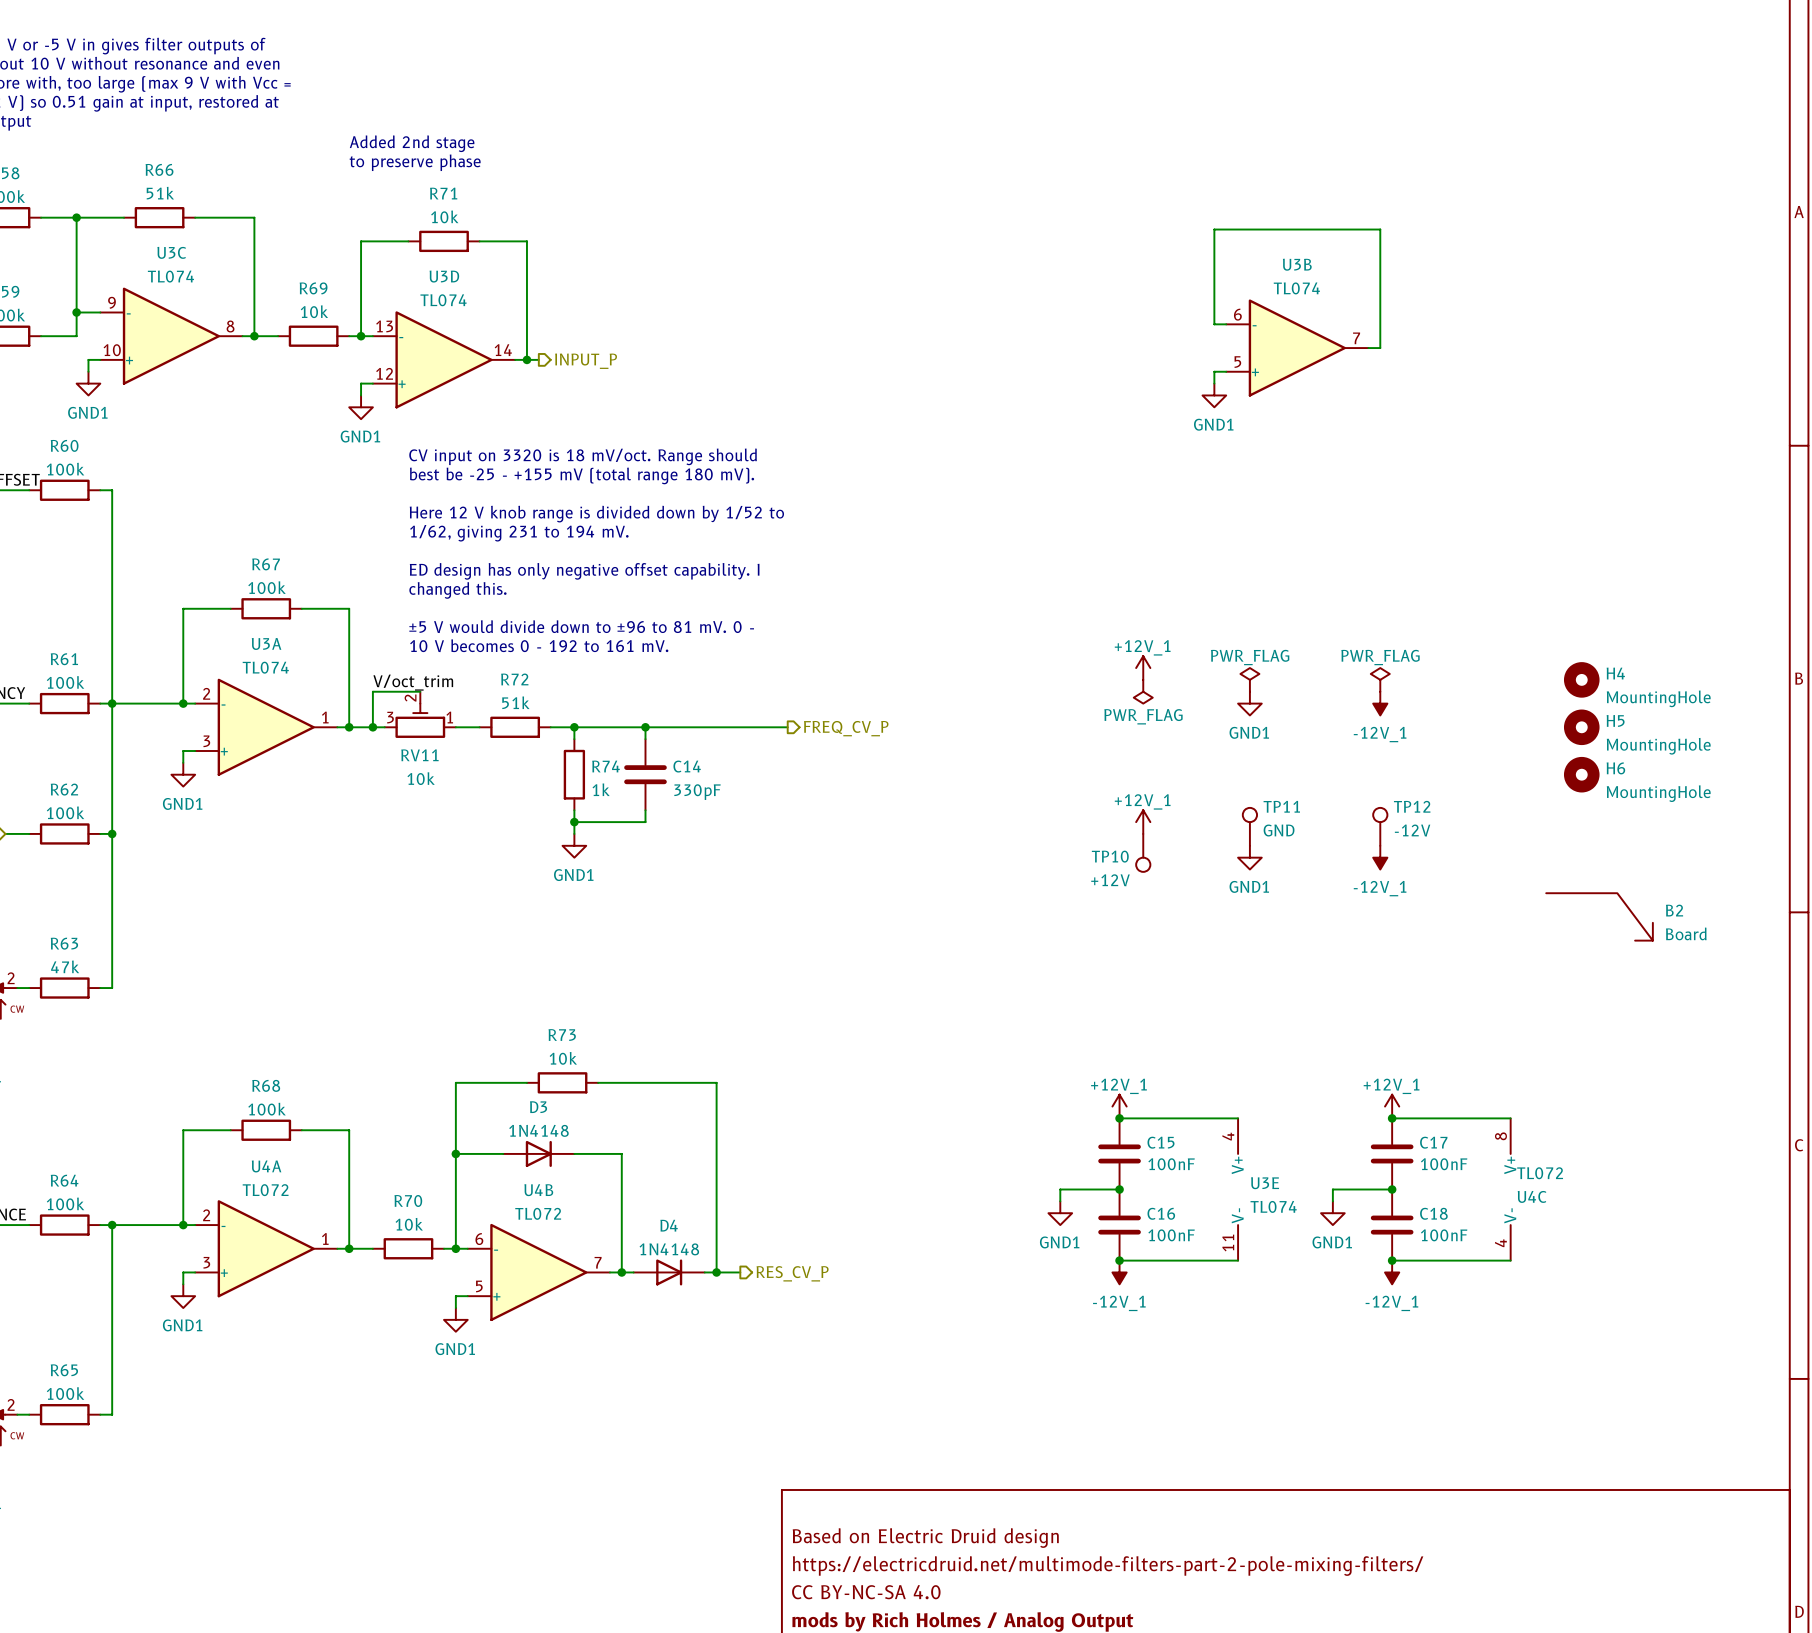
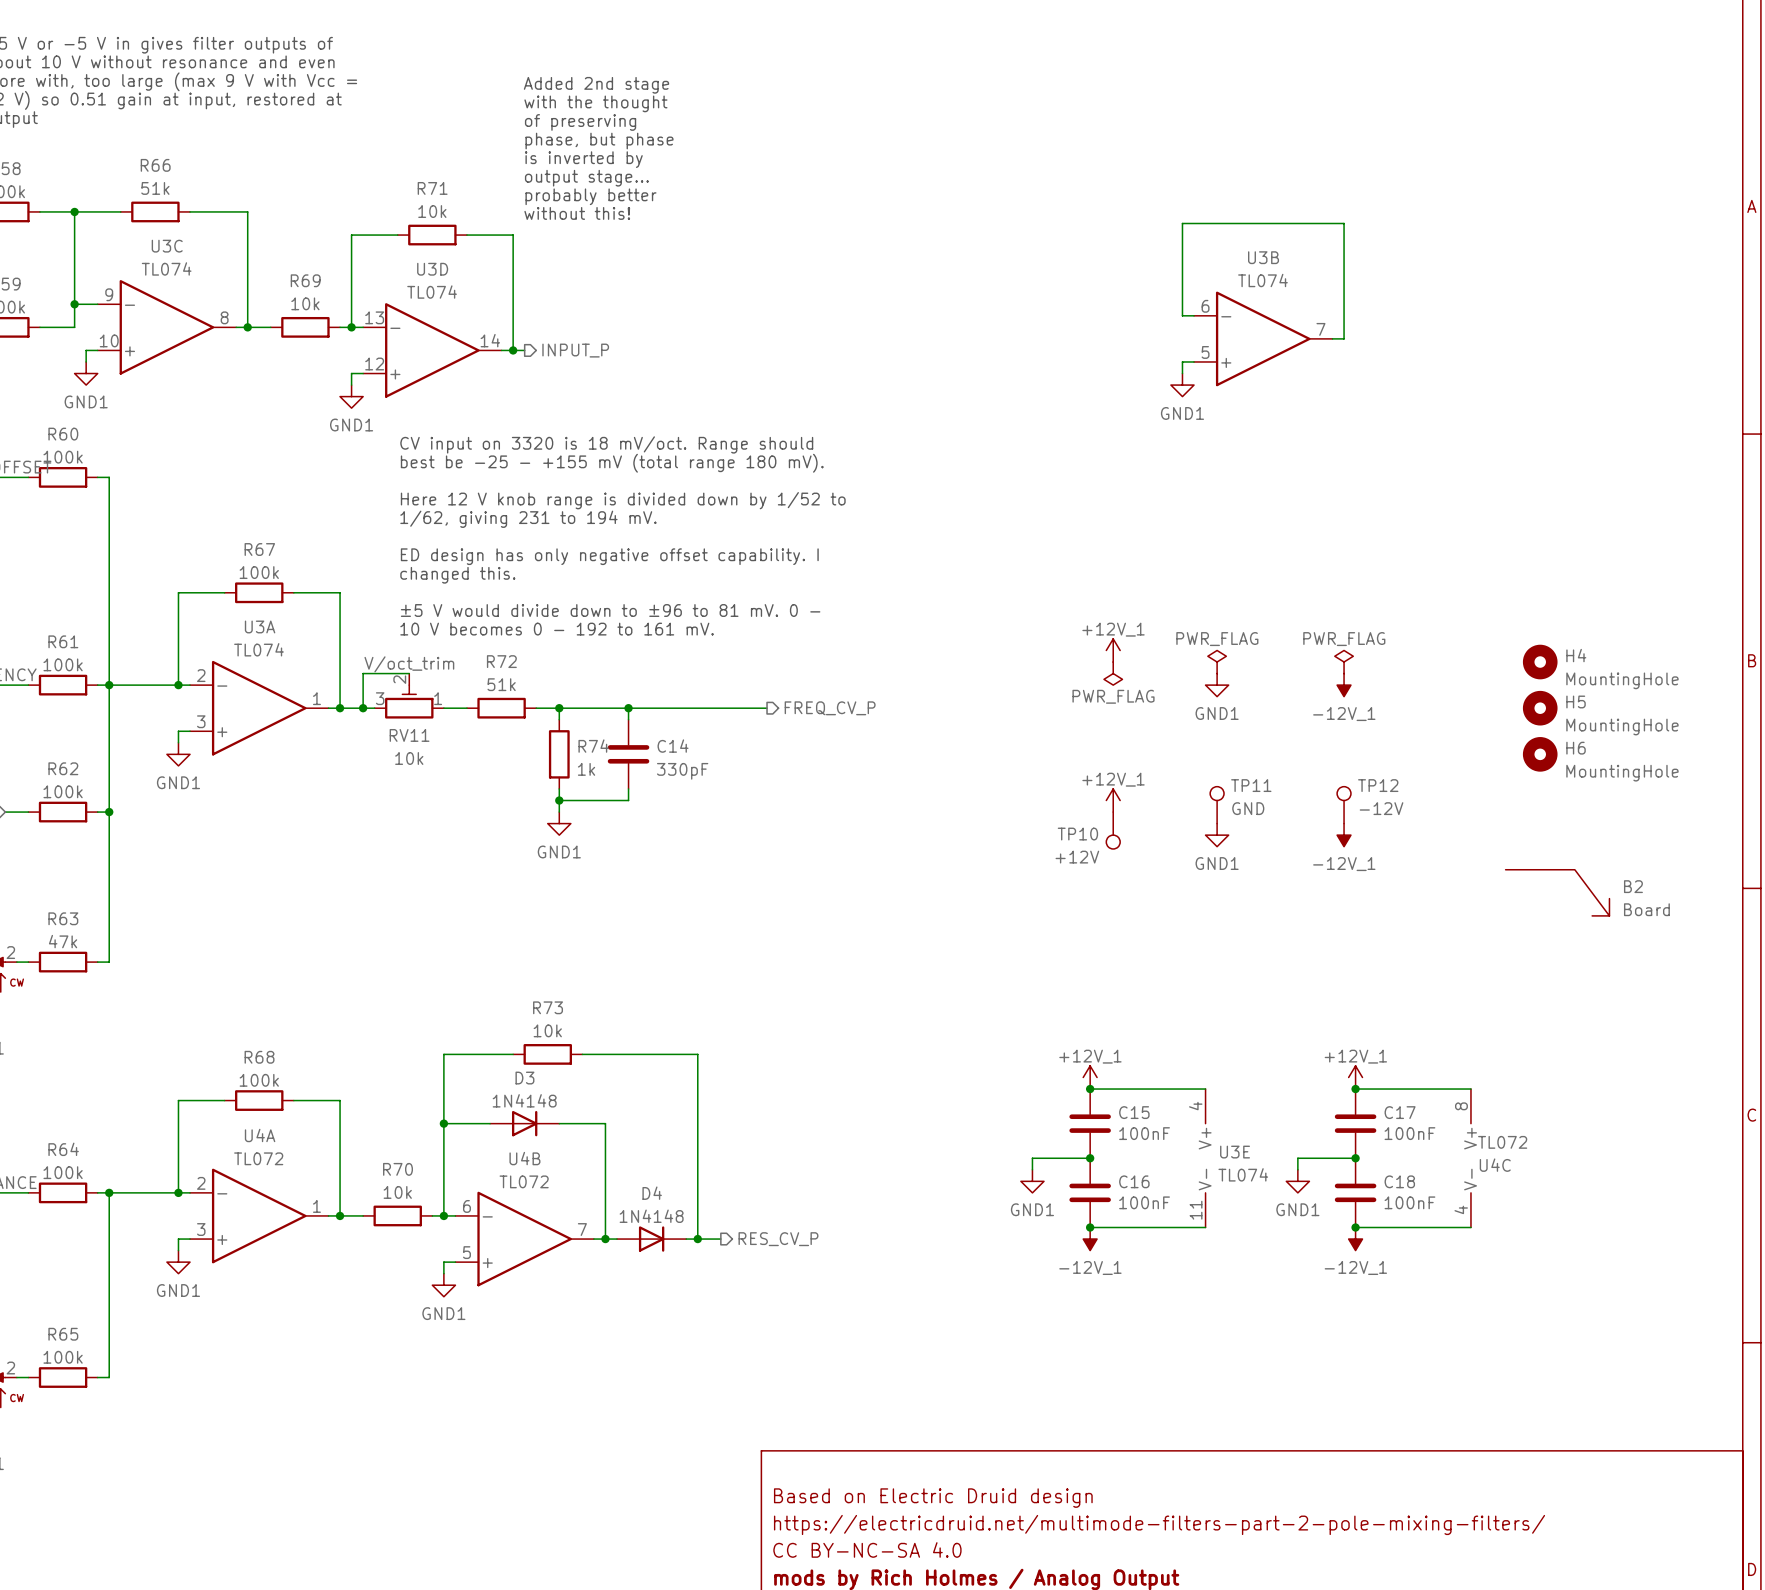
text: none -> with the thought (595, 103)
text: none -> of preserving (580, 122)
text position: Added 2nd stage (412, 143) -> Added 2nd stage (596, 85)
text: none -> phase, but phase (599, 141)
text: to preserve phase (415, 162) -> none
text: none -> is inverted by (583, 159)
text: none -> output stage... (586, 178)
text: none -> probably better (590, 196)
text: none -> without this! (577, 213)

